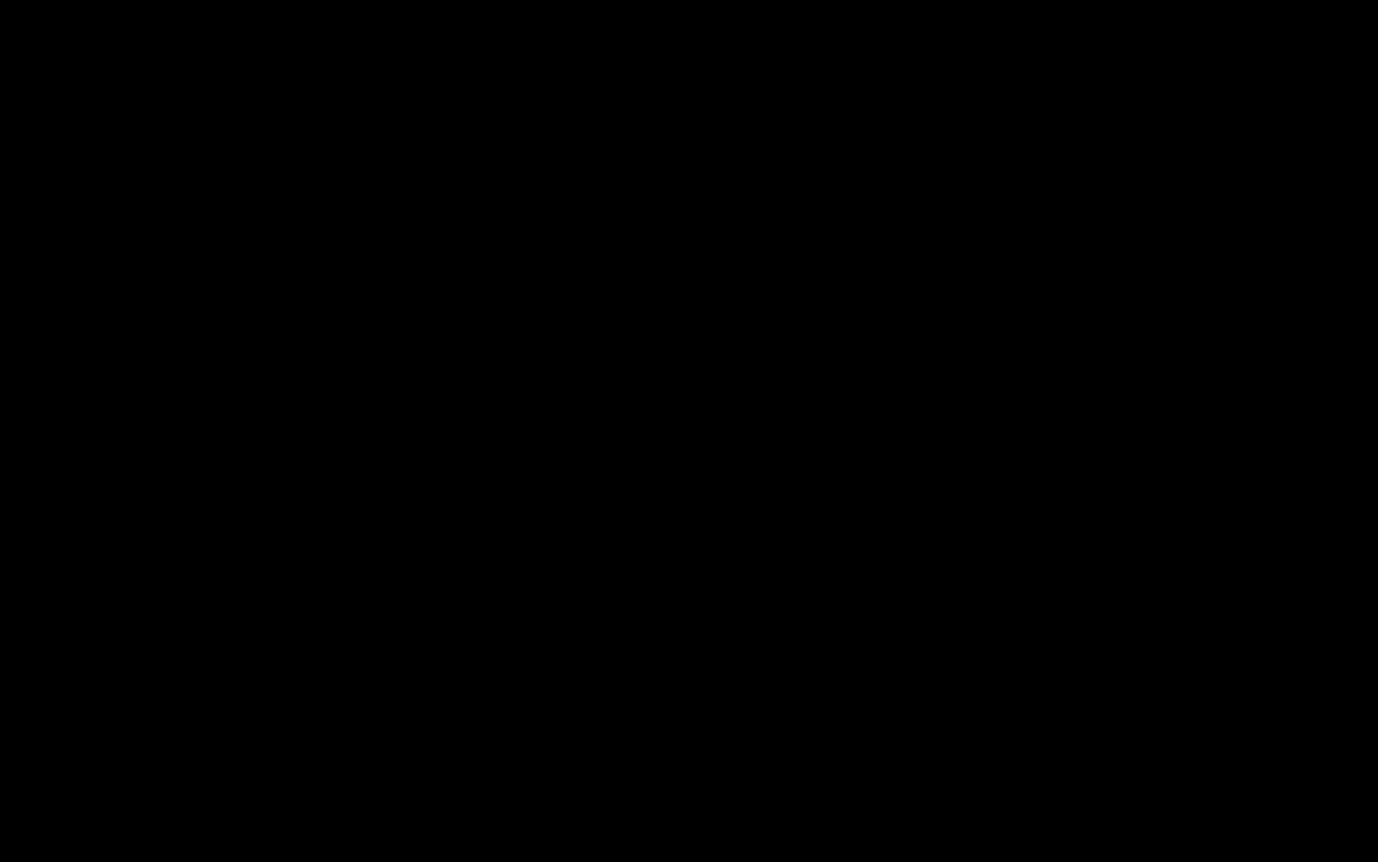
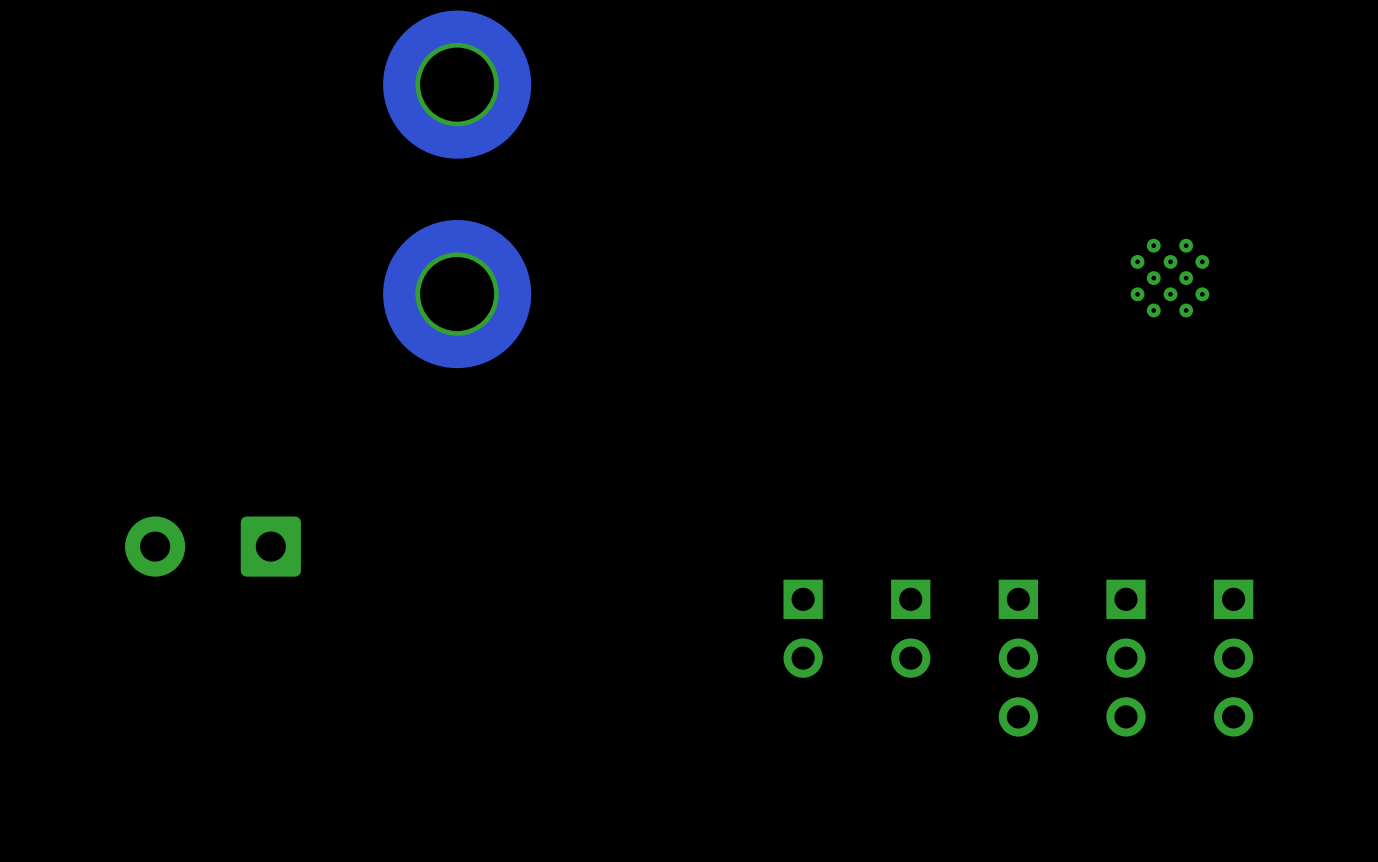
part: none -> (457, 84)
part: none -> (1169, 278)
part: none -> (457, 294)
part: none -> (212, 546)
part: none -> (803, 628)
part: none -> (910, 628)
part: none -> (1018, 658)
part: none -> (1125, 658)
part: none -> (1233, 658)

